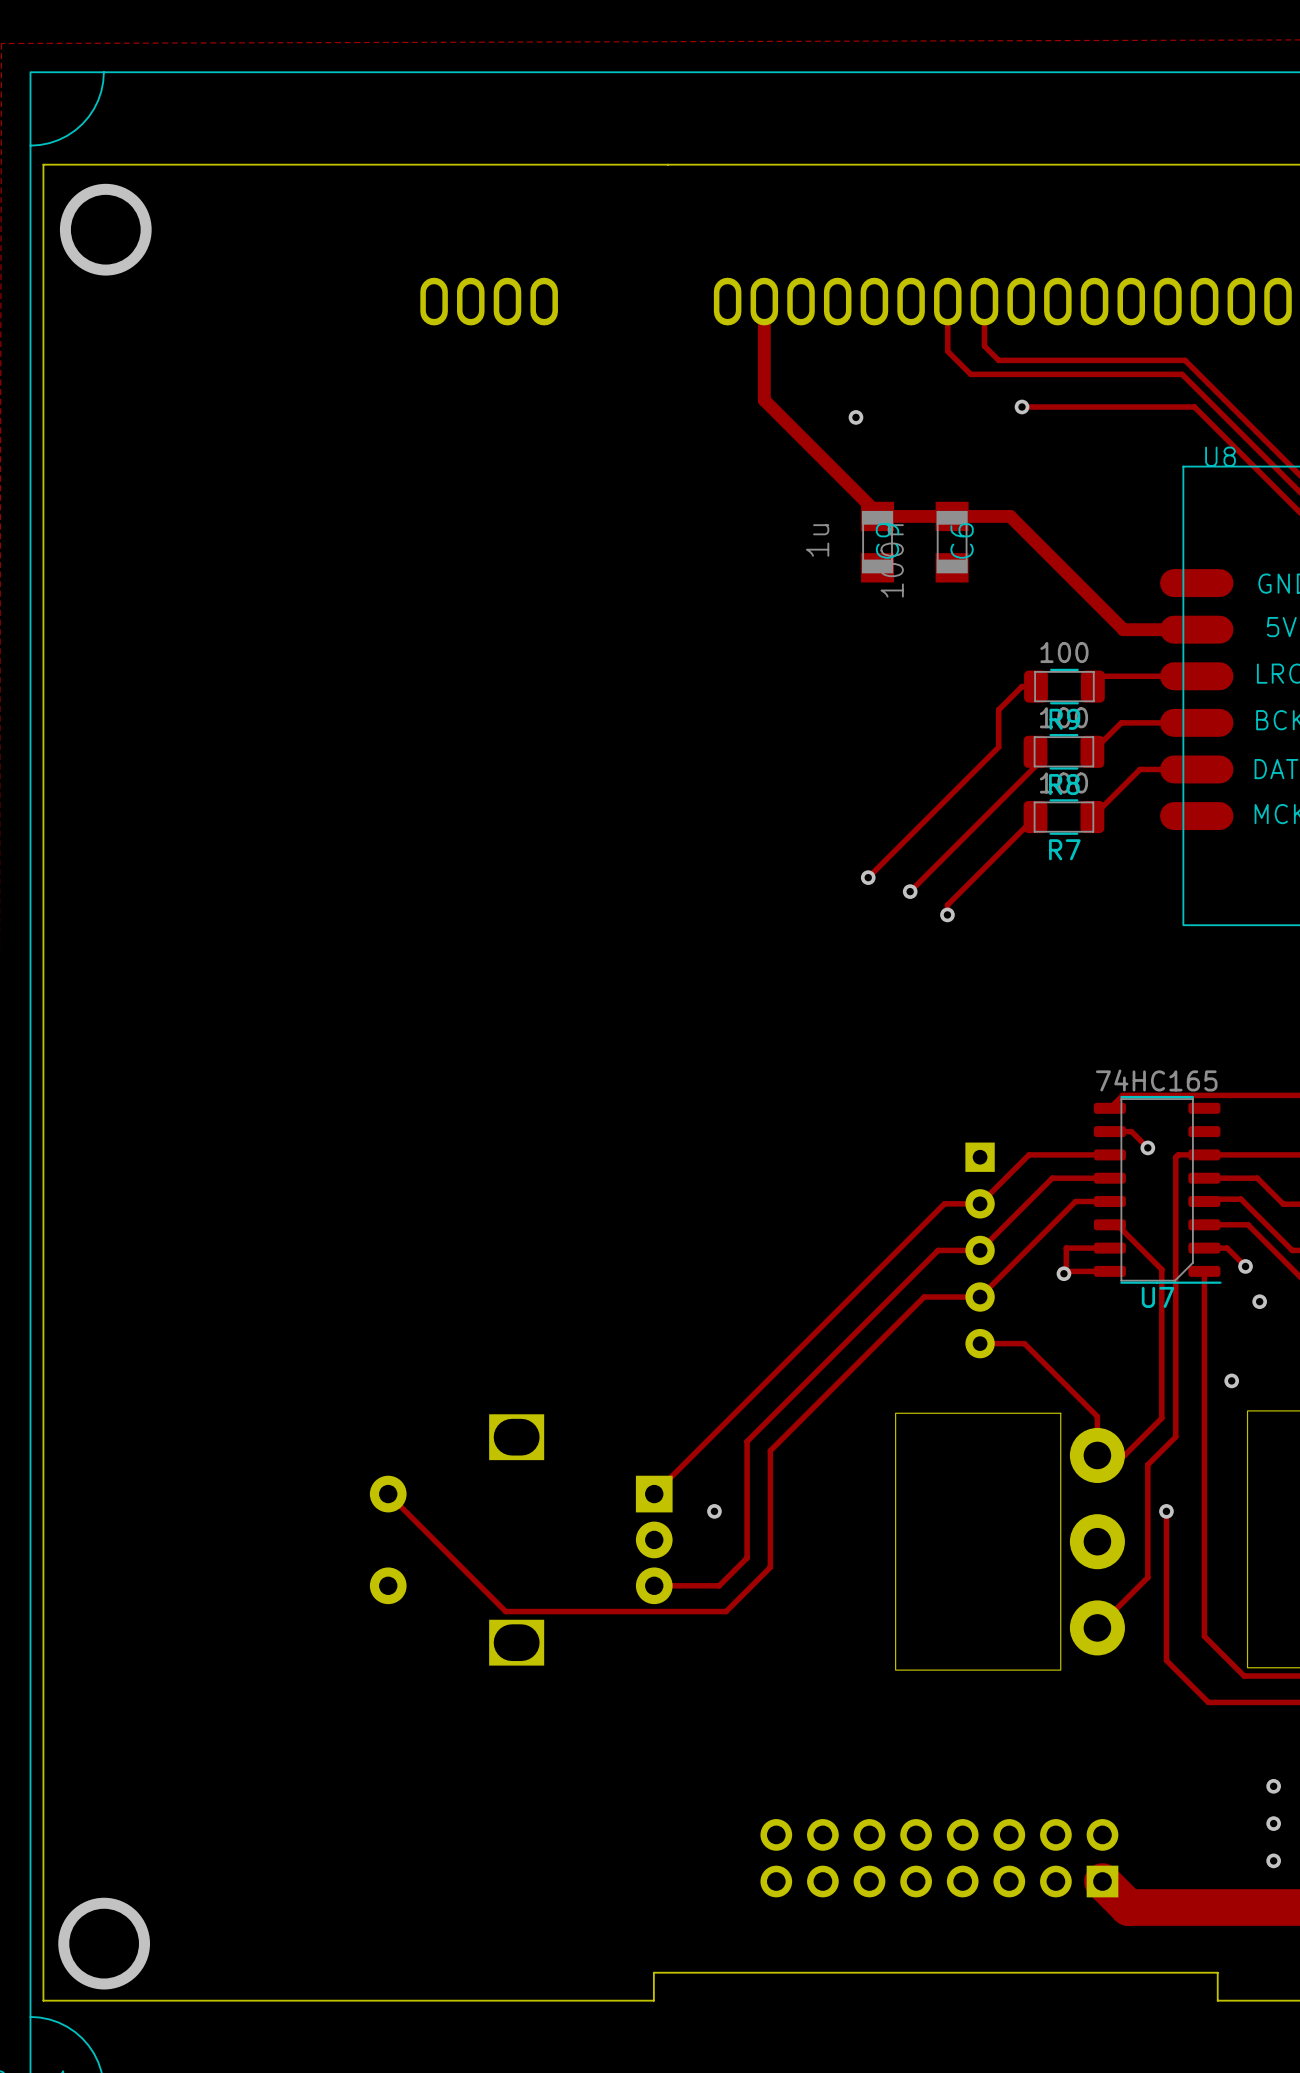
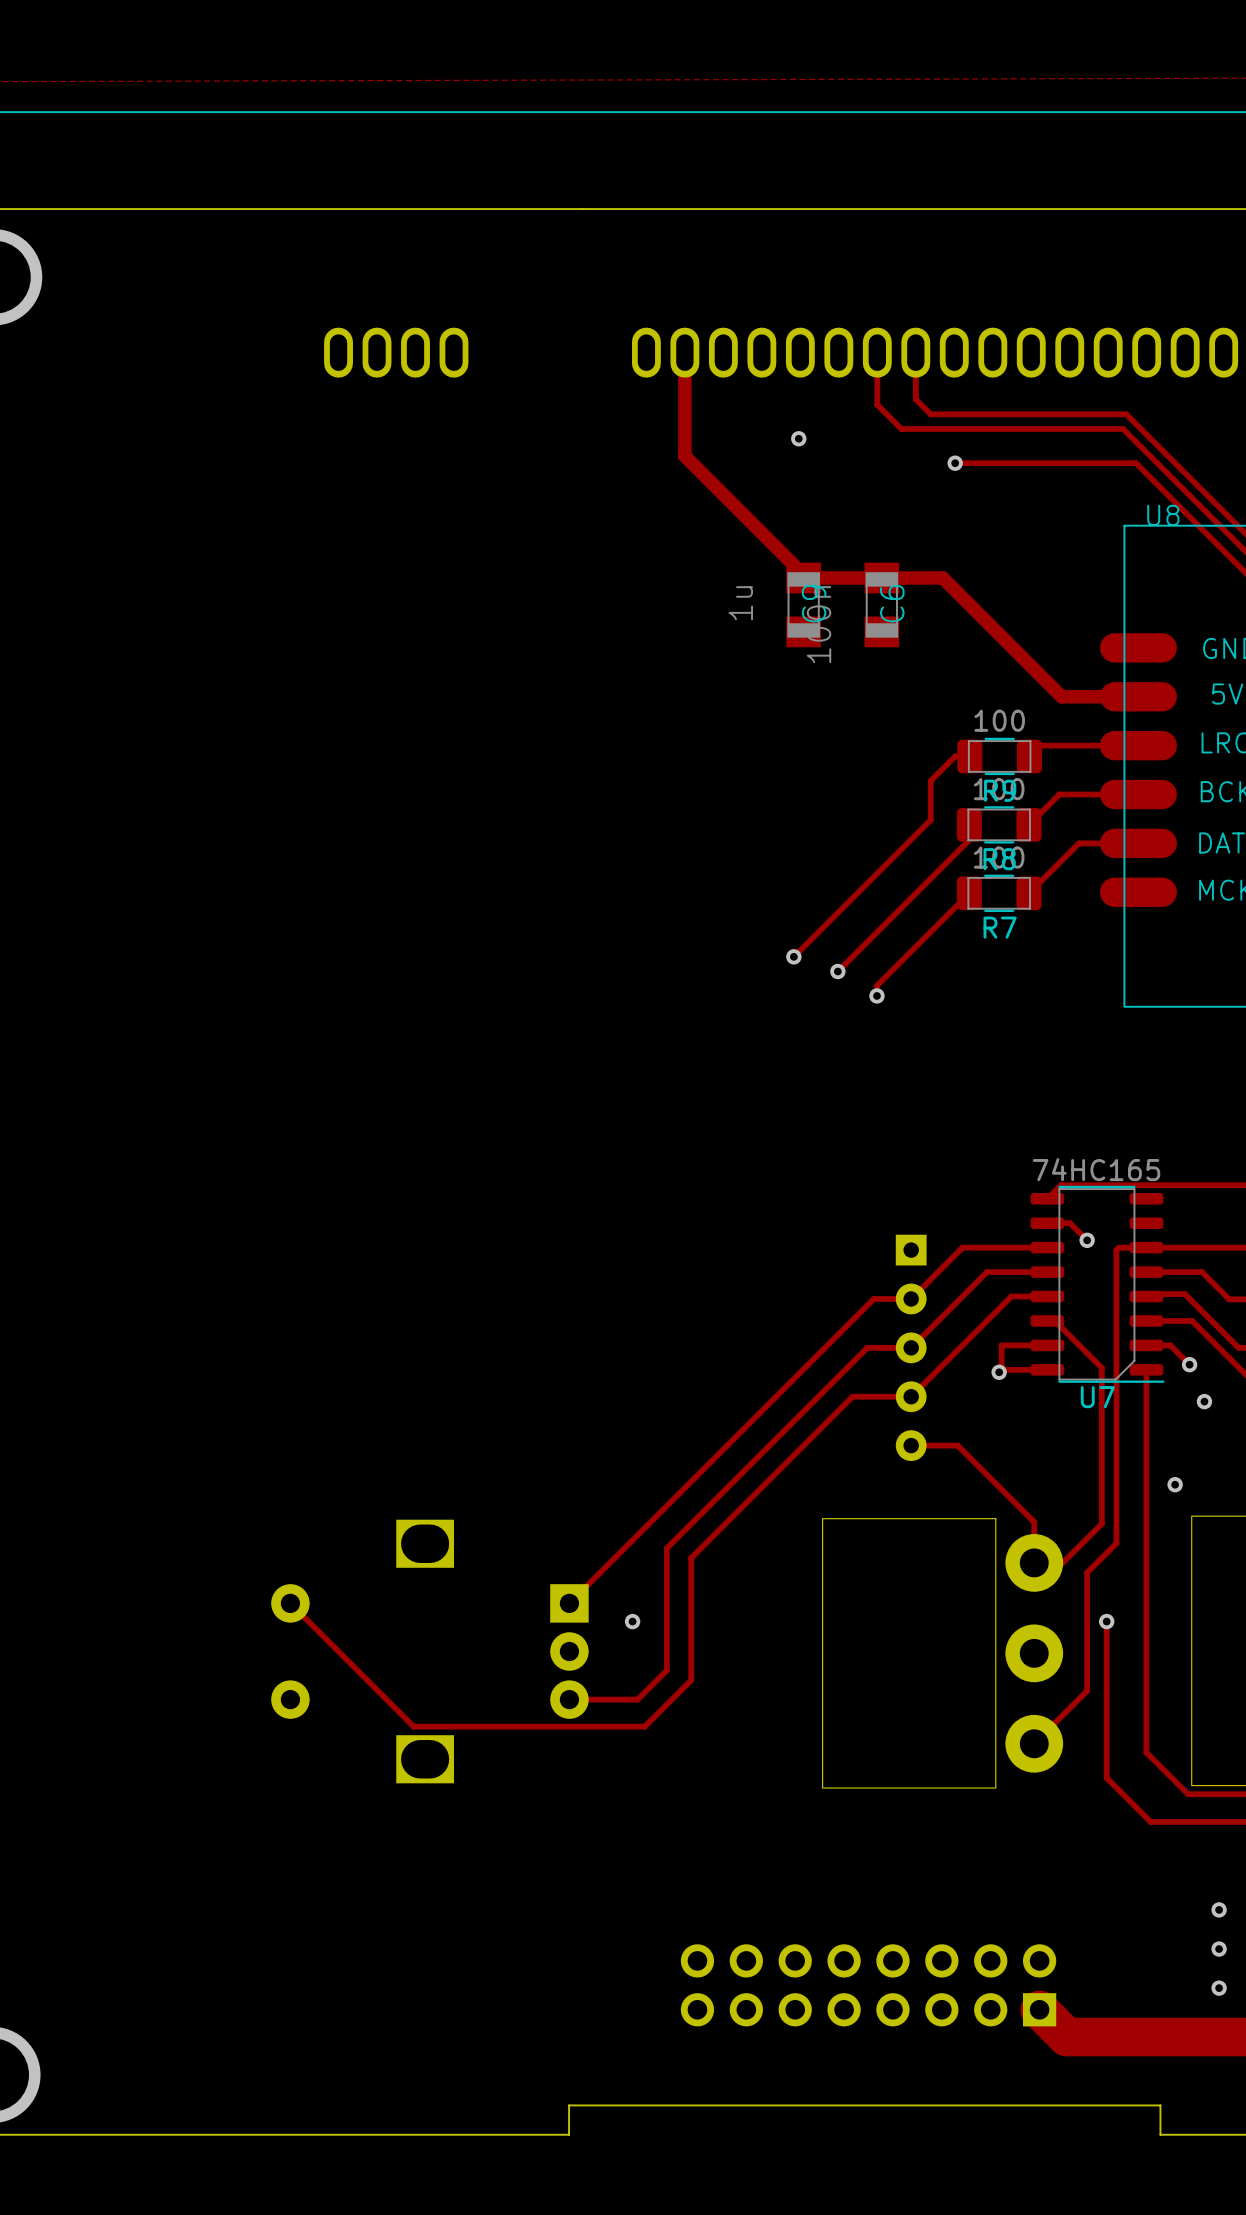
via position: (855, 417) -> (798, 438)

